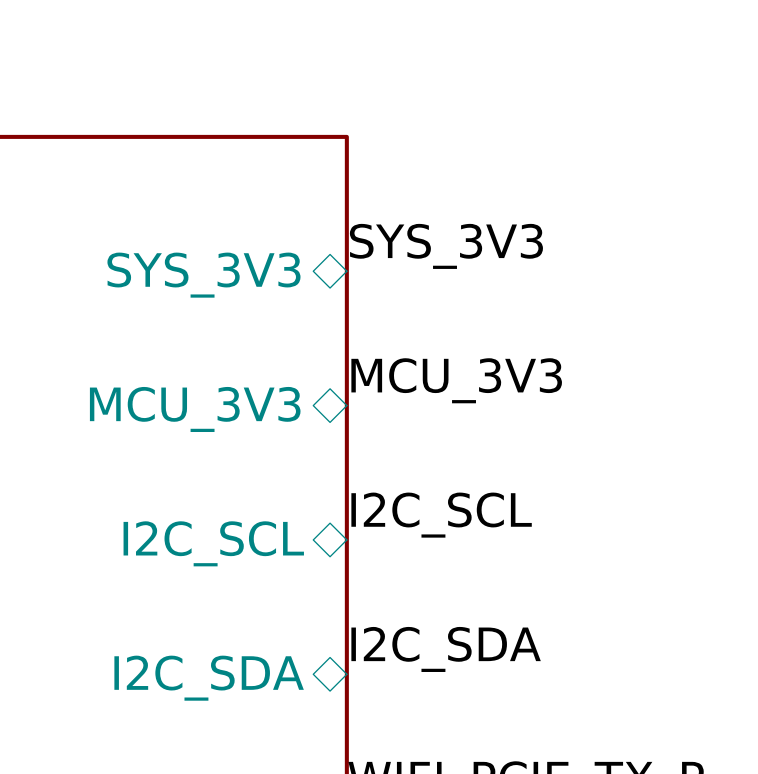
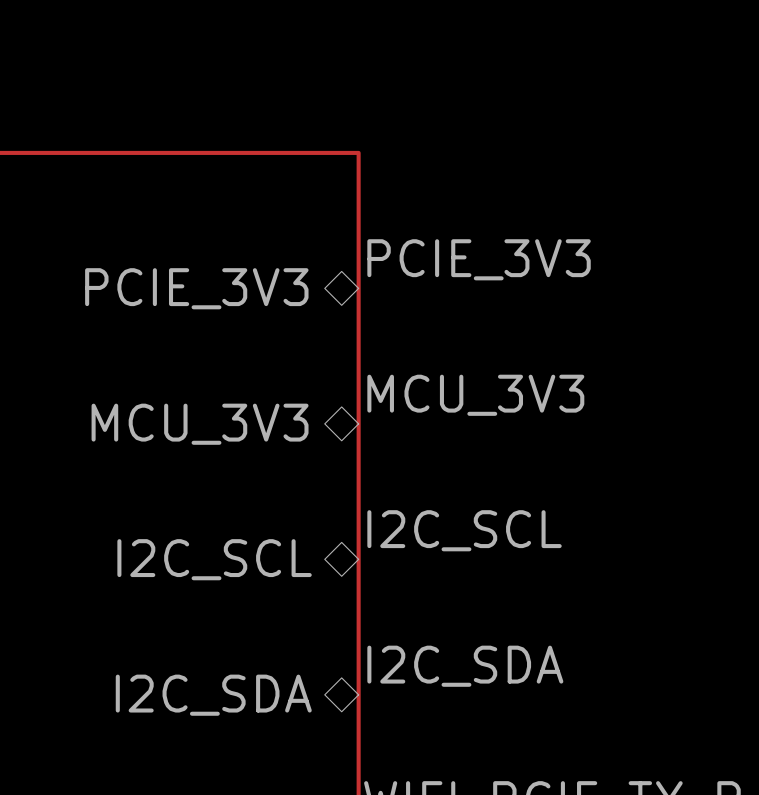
label: SYS_3V3 (446, 246) -> PCIE_3V3 (479, 259)
sheet pin: SYS_3V3 (203, 275) -> PCIE_3V3 (196, 288)

